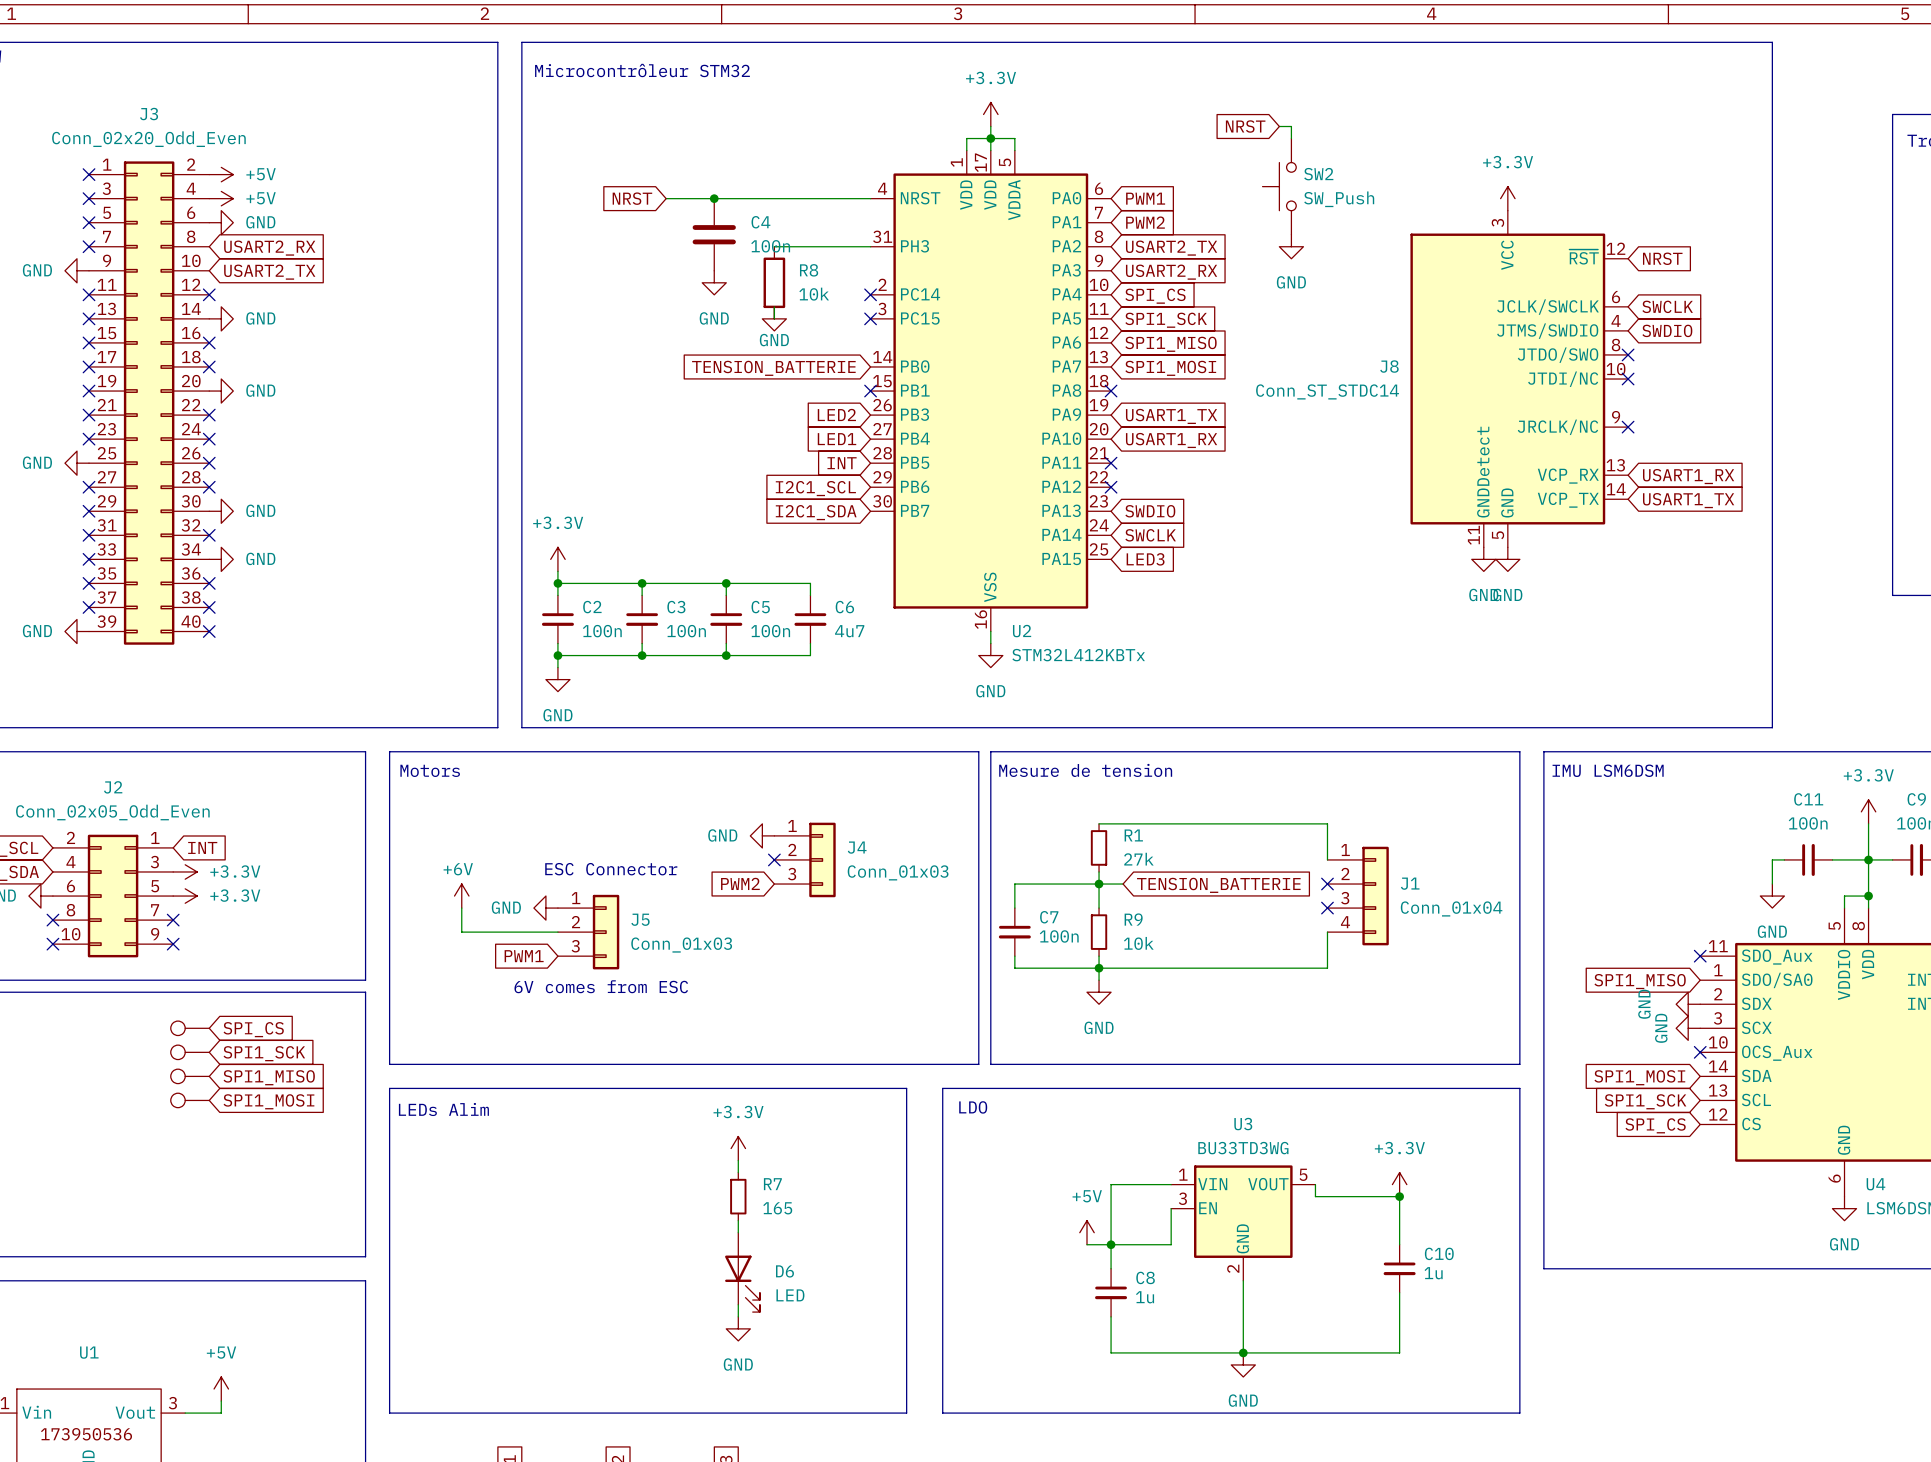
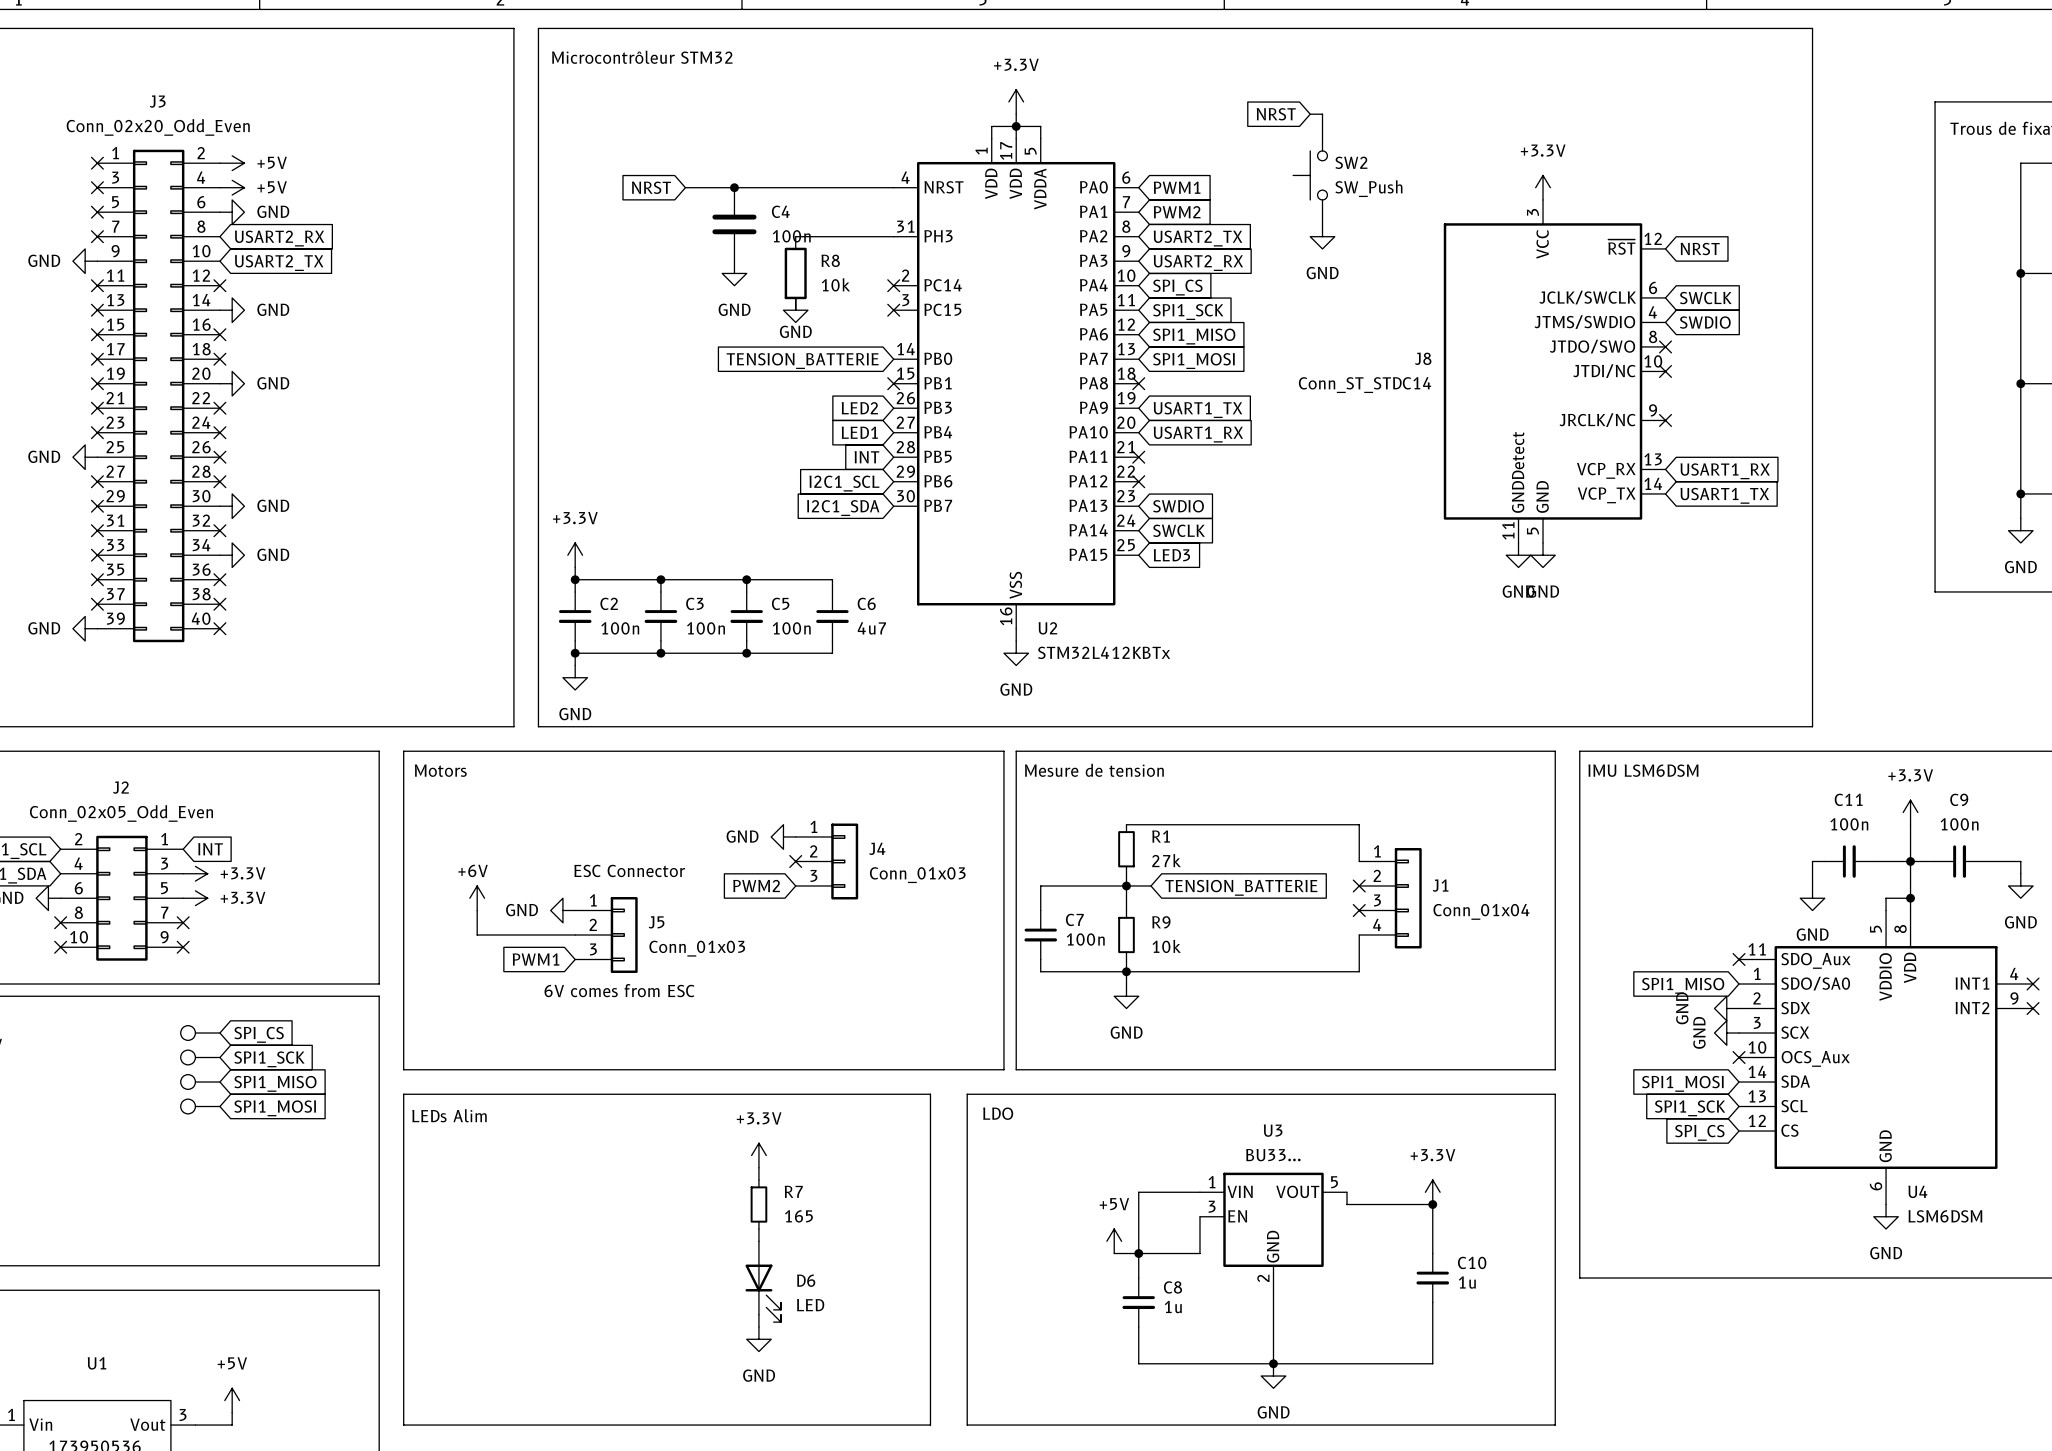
U3 value: BU33TD3WG (1243, 1148) -> BU33... (1273, 1155)

